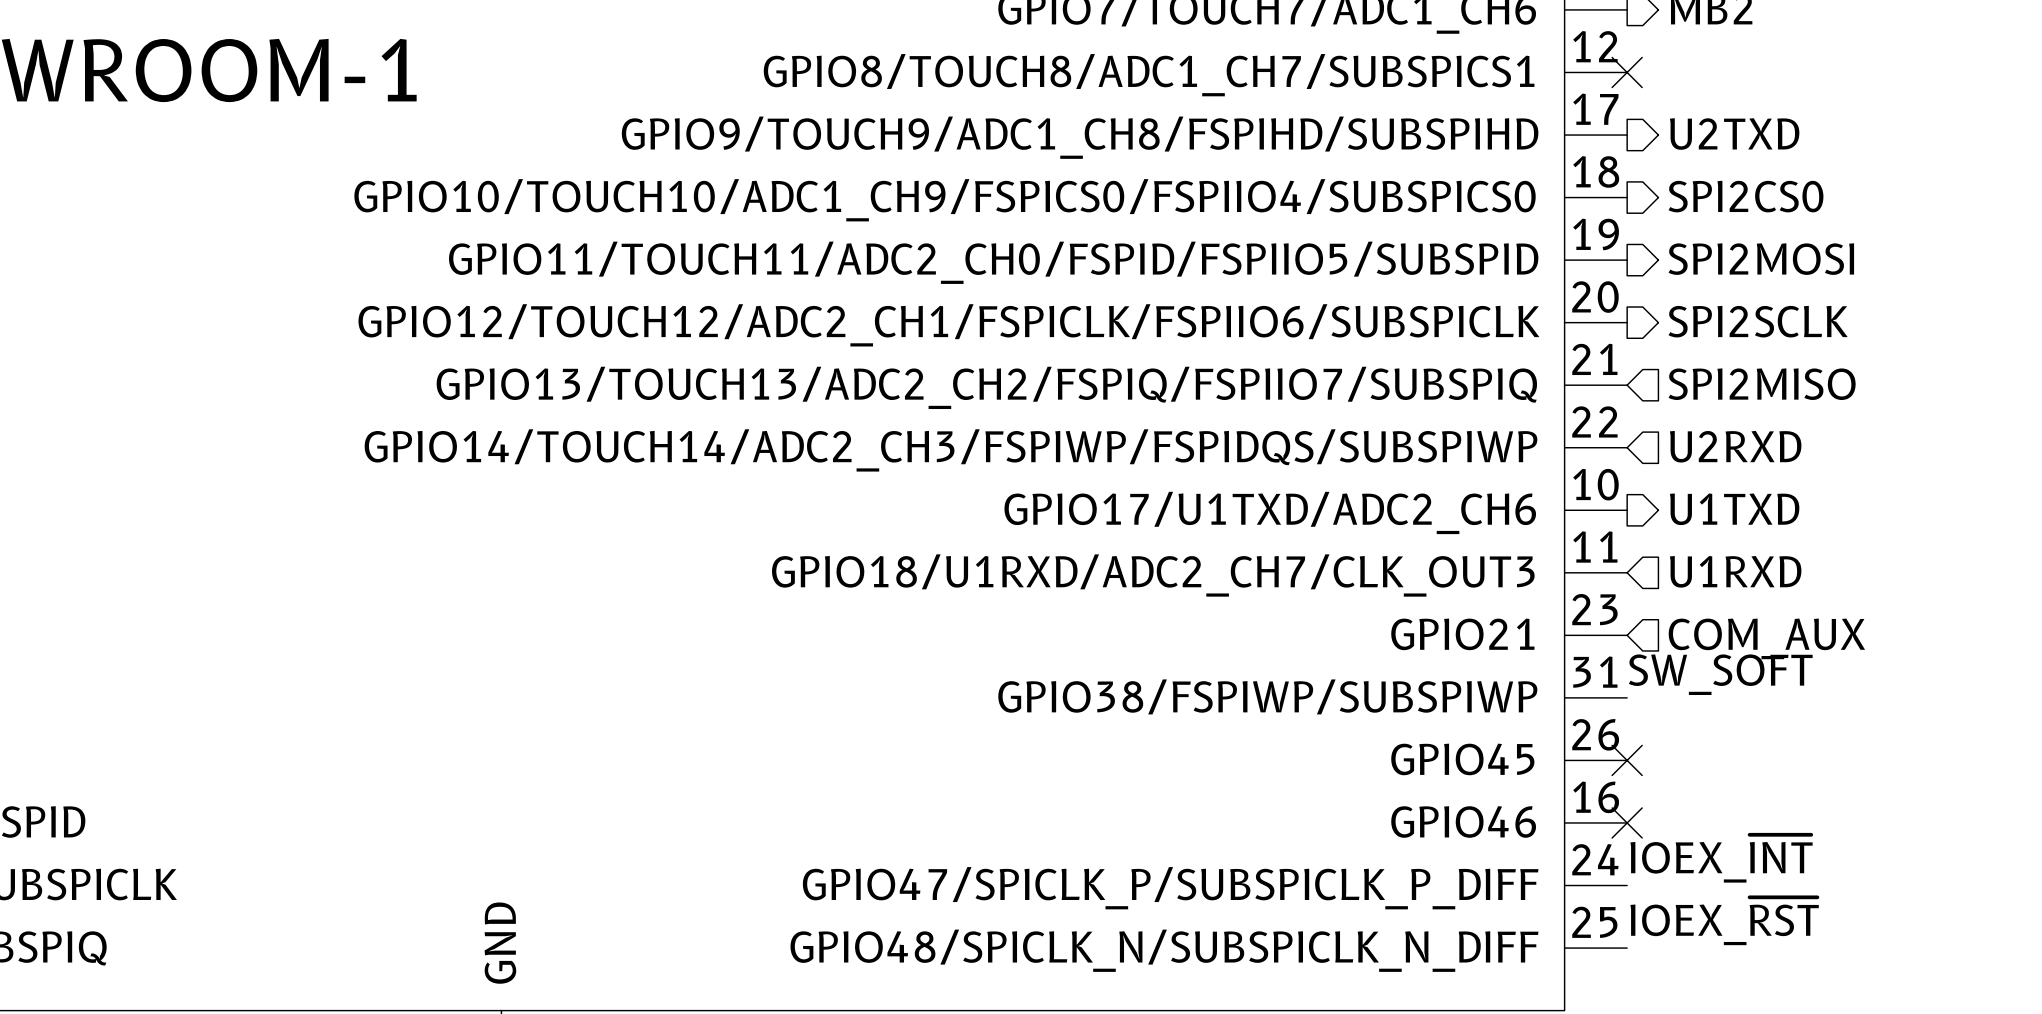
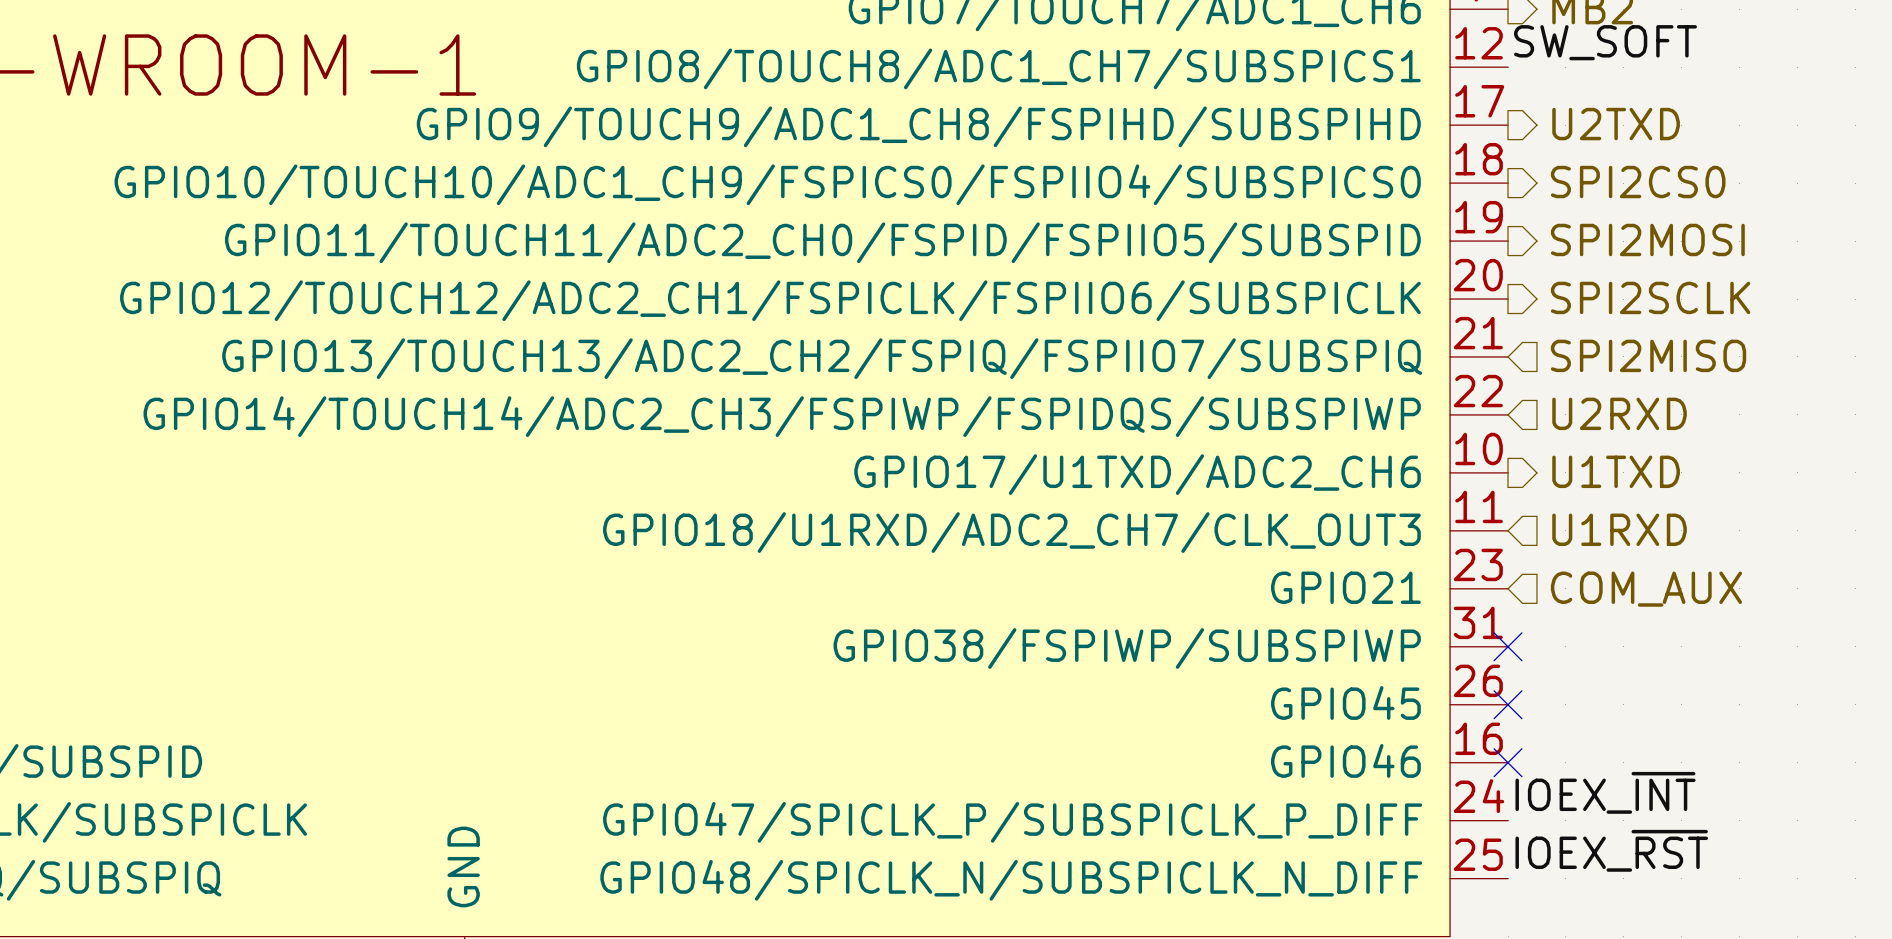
label: none -> SW_SOFT (1605, 42)
no-connect mark: (1627, 72) -> none
label: SW_SOFT (1720, 674) -> none
no-connect mark: none -> (1508, 646)

